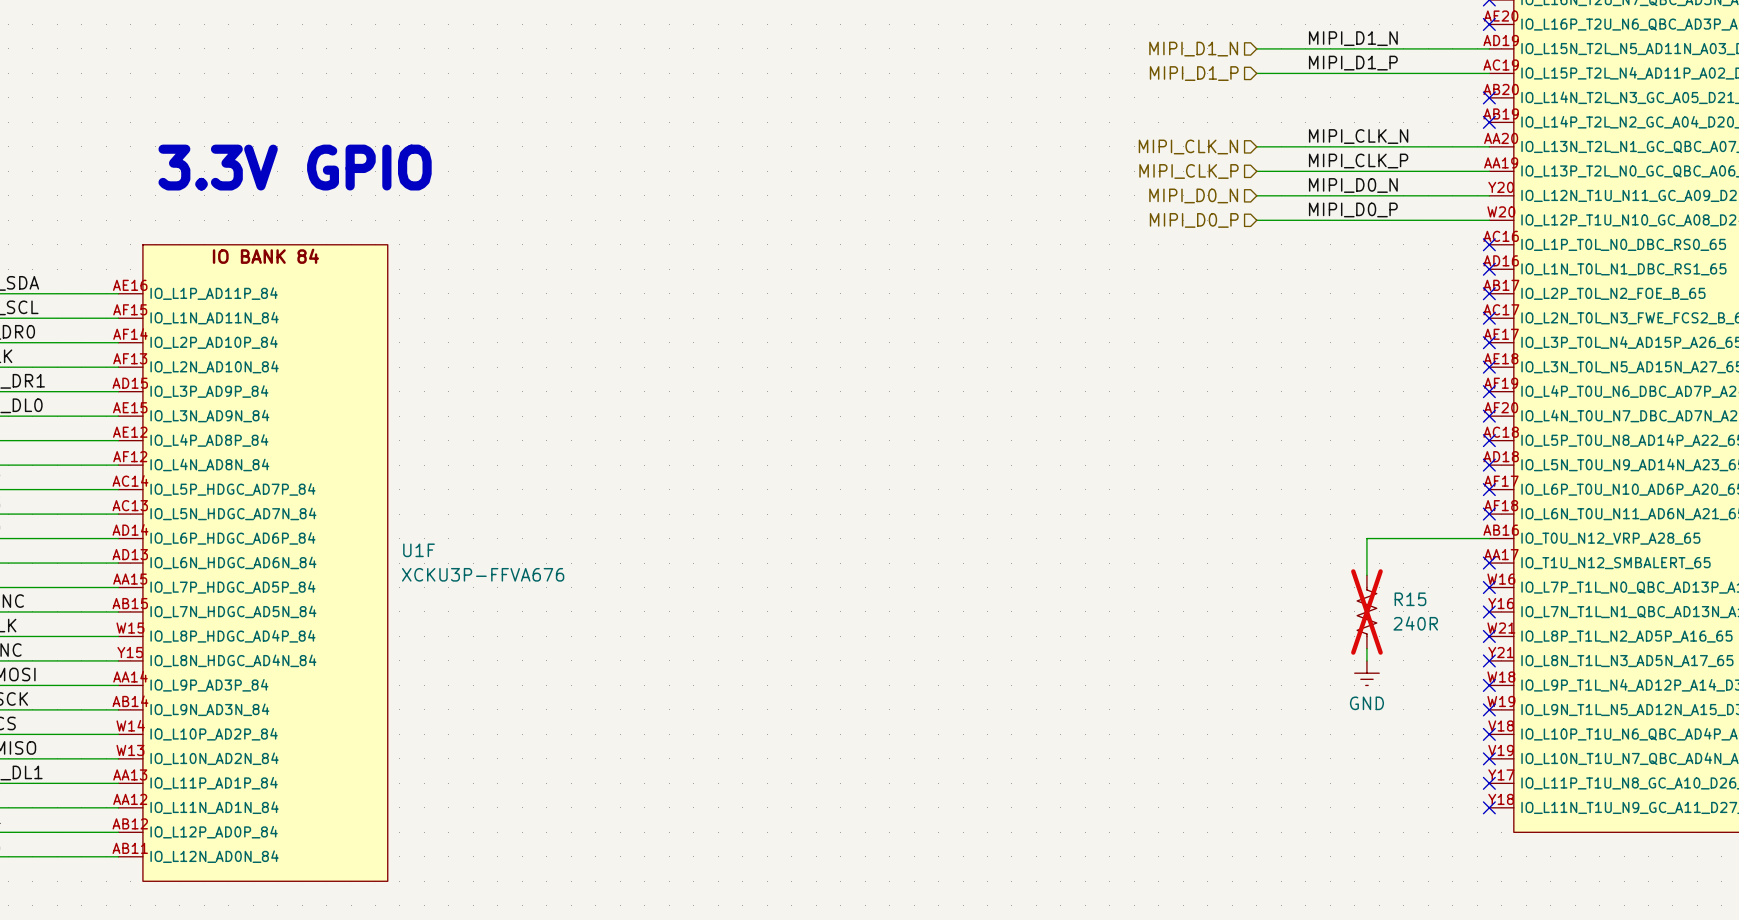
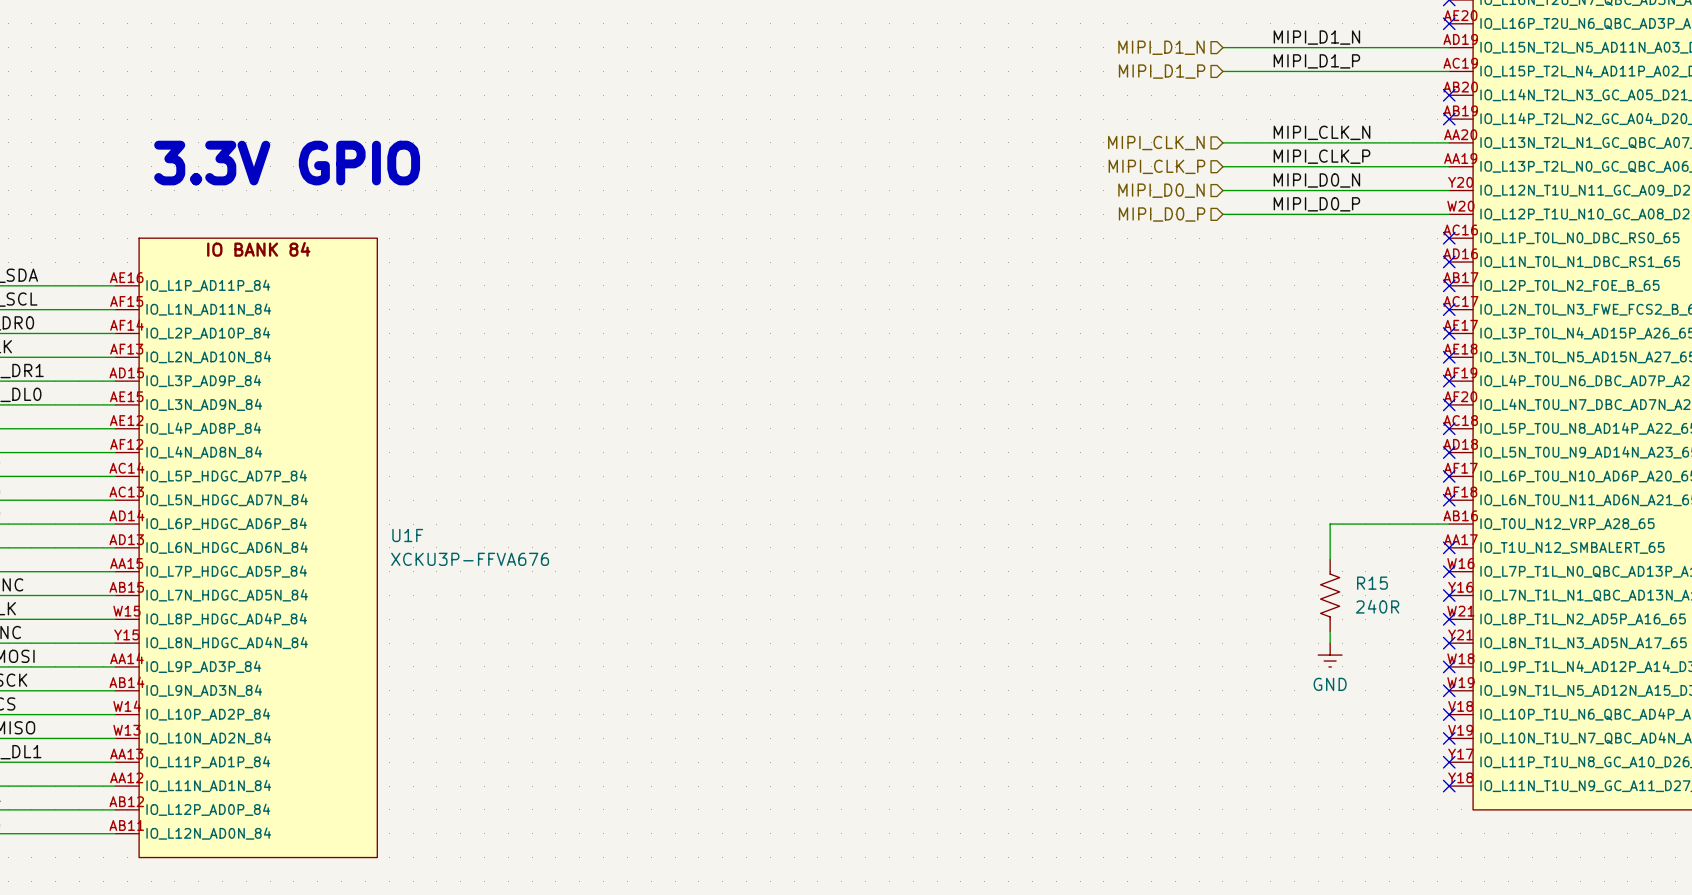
R15 do-not-place cross: (1366, 611) -> none

